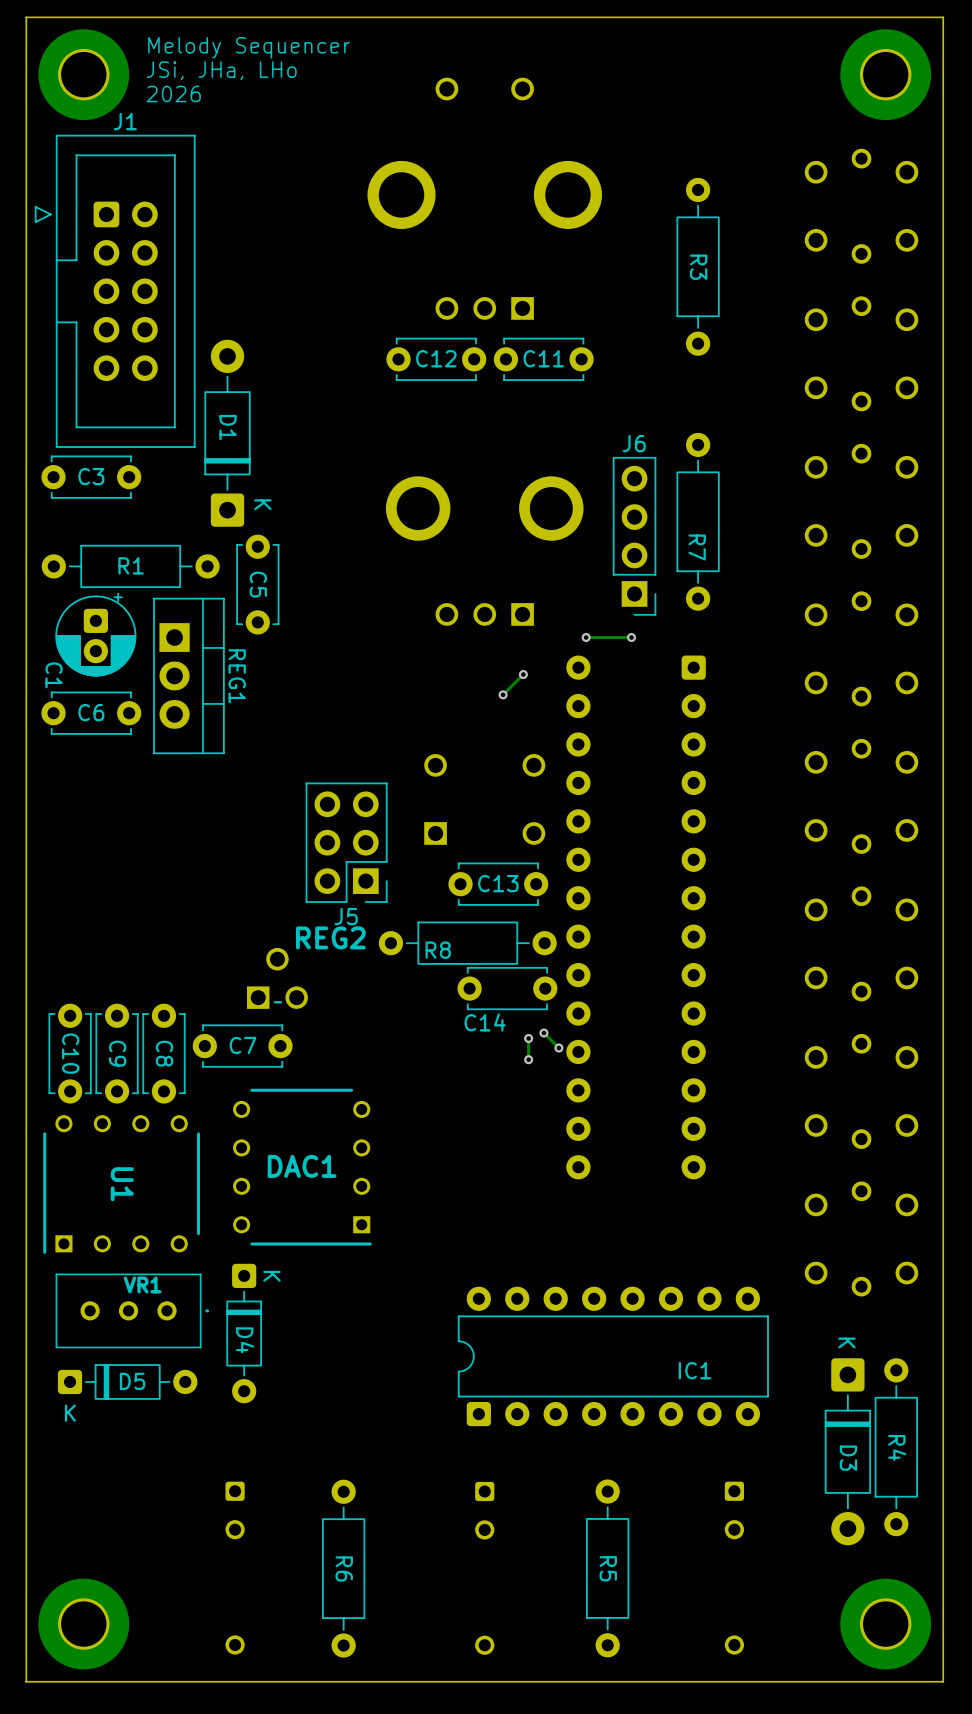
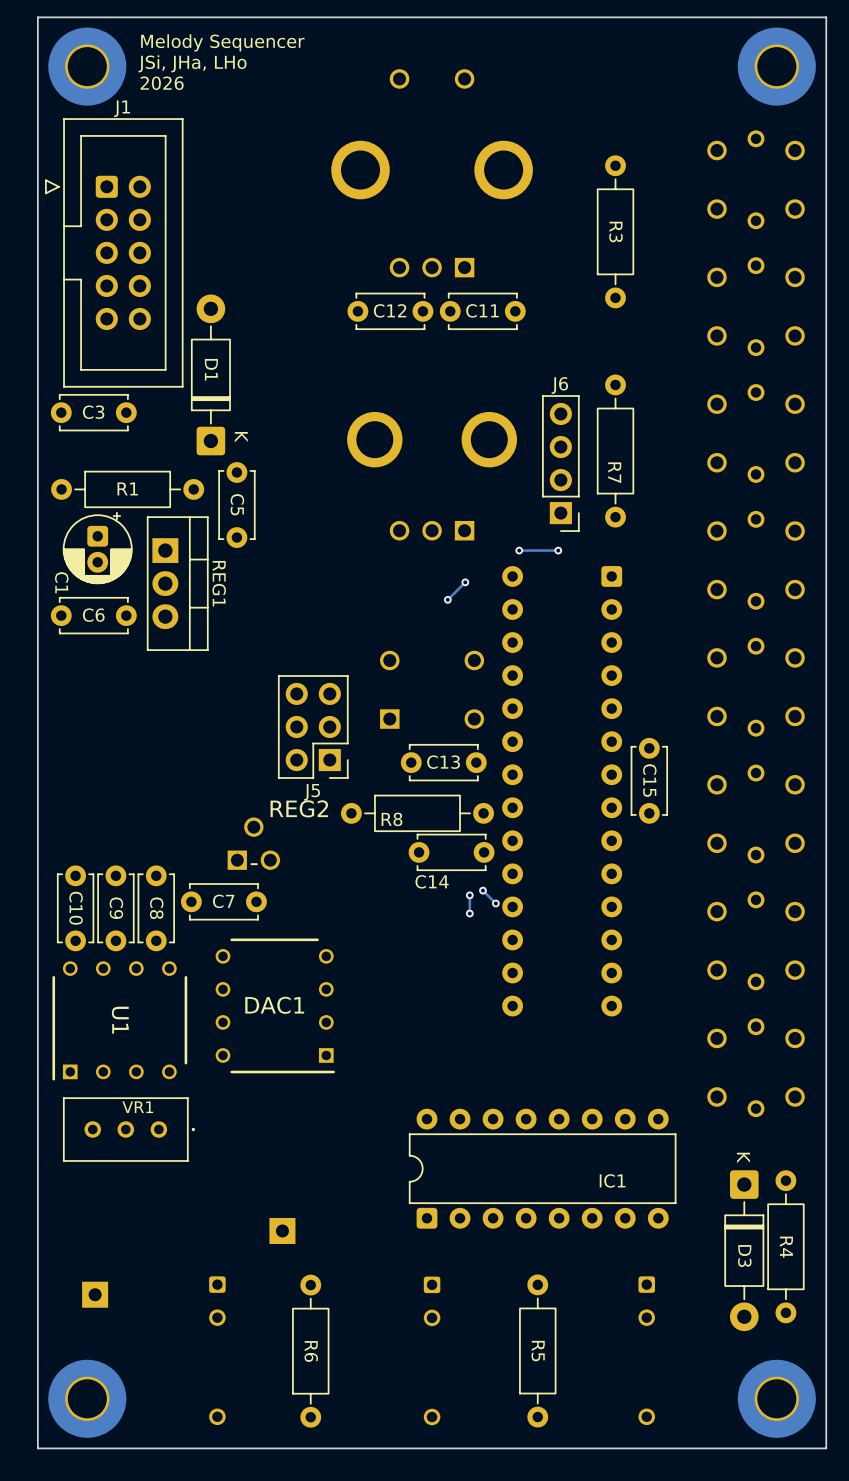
C15: none -> (649, 780)
D4: (244, 1333) -> none
D5: (127, 1381) -> none
part: none -> (282, 1230)
part: none -> (95, 1294)

